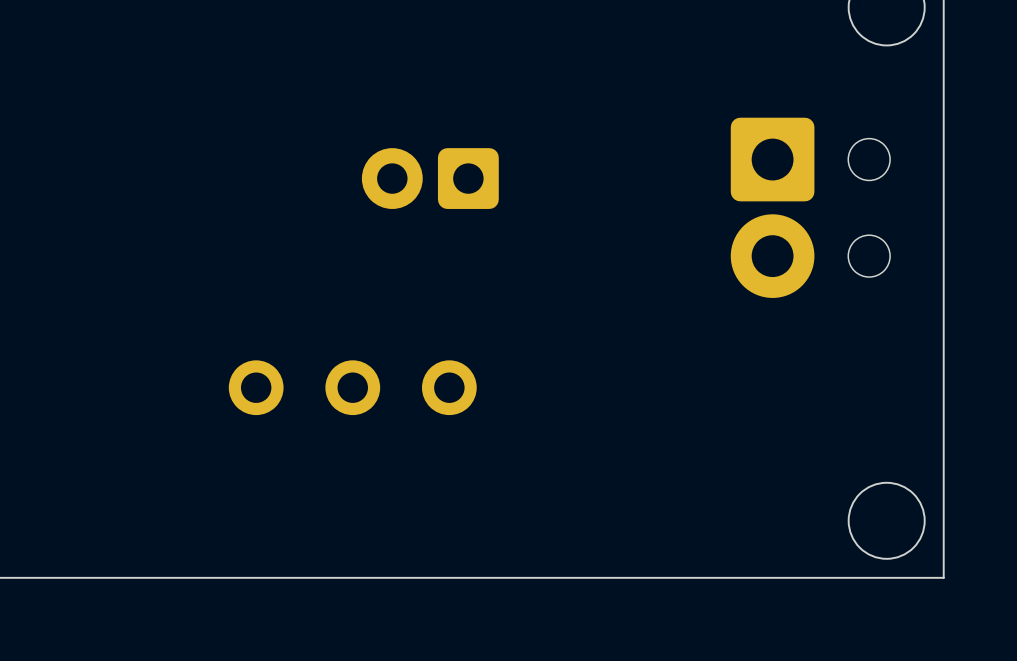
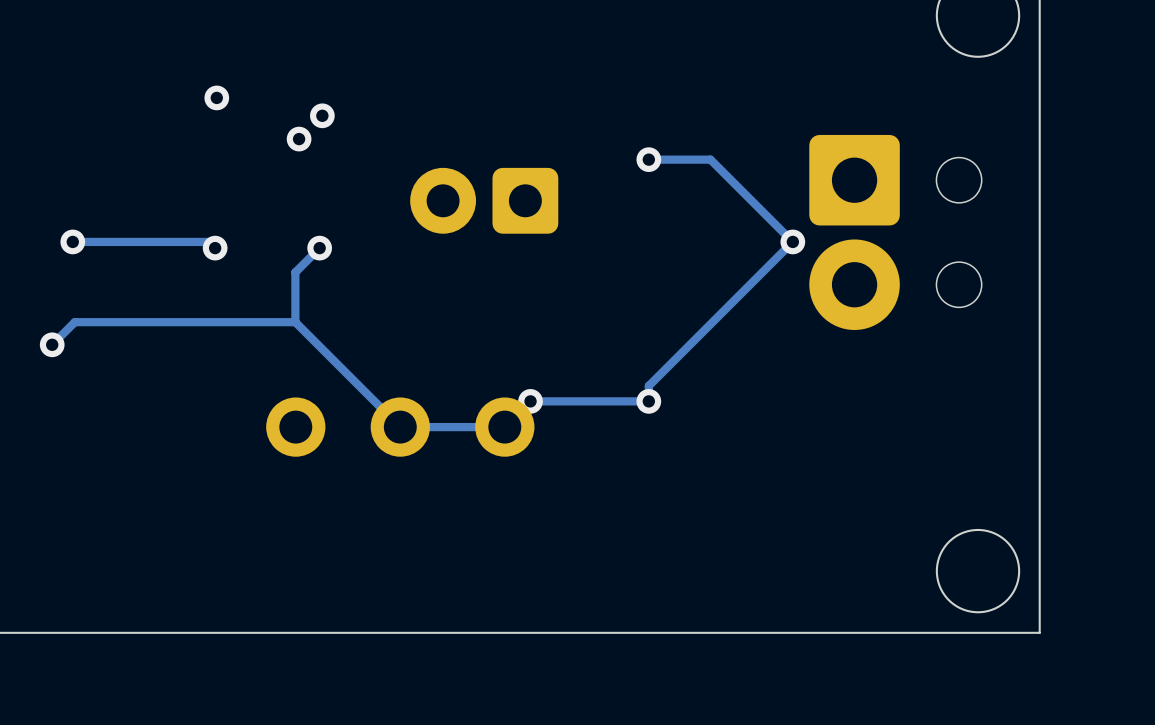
via: none -> (216, 97)
via: none -> (322, 115)
via: none -> (299, 139)
track: none -> (648, 159) (710, 159) (792, 241) (648, 385) (648, 401) (530, 401) (504, 427) (400, 427) (295, 322)
via: none -> (648, 159)
track: none -> (72, 241) (208, 241) (215, 248)
via: none -> (72, 241)
via: none -> (792, 241)
via: none -> (215, 248)
track: none -> (319, 248) (295, 272) (295, 322)
via: none -> (319, 248)
track: none -> (295, 322) (74, 322) (52, 344)
via: none -> (52, 344)
via: none -> (530, 401)
via: none -> (648, 401)

